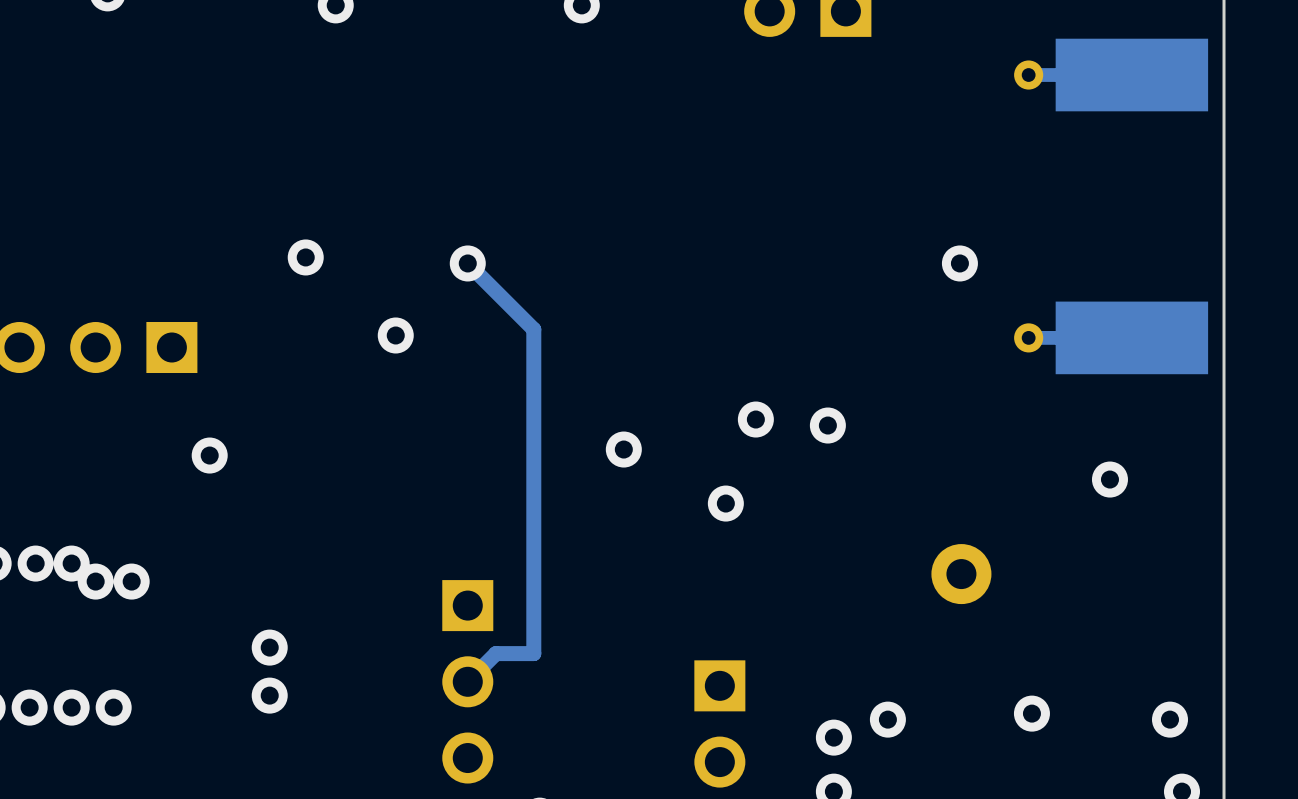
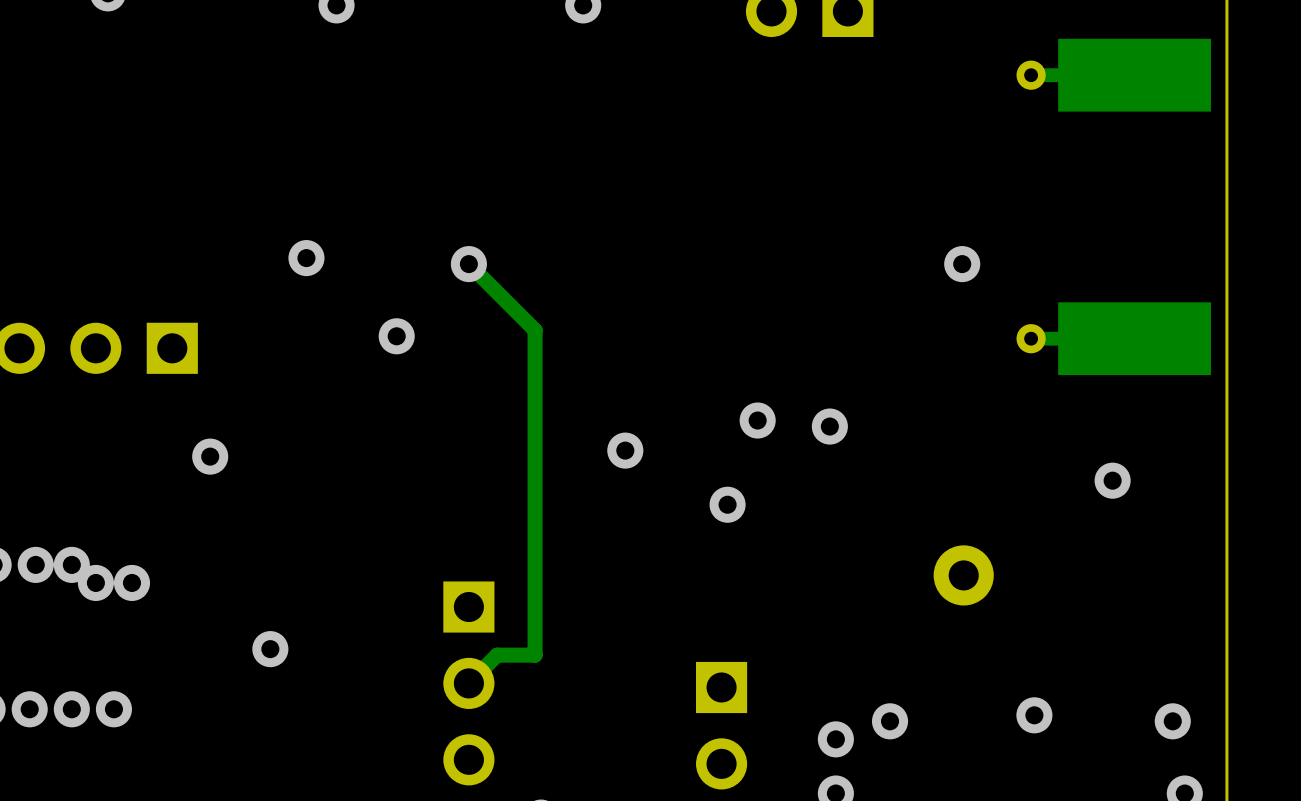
via: (269, 695) -> none

